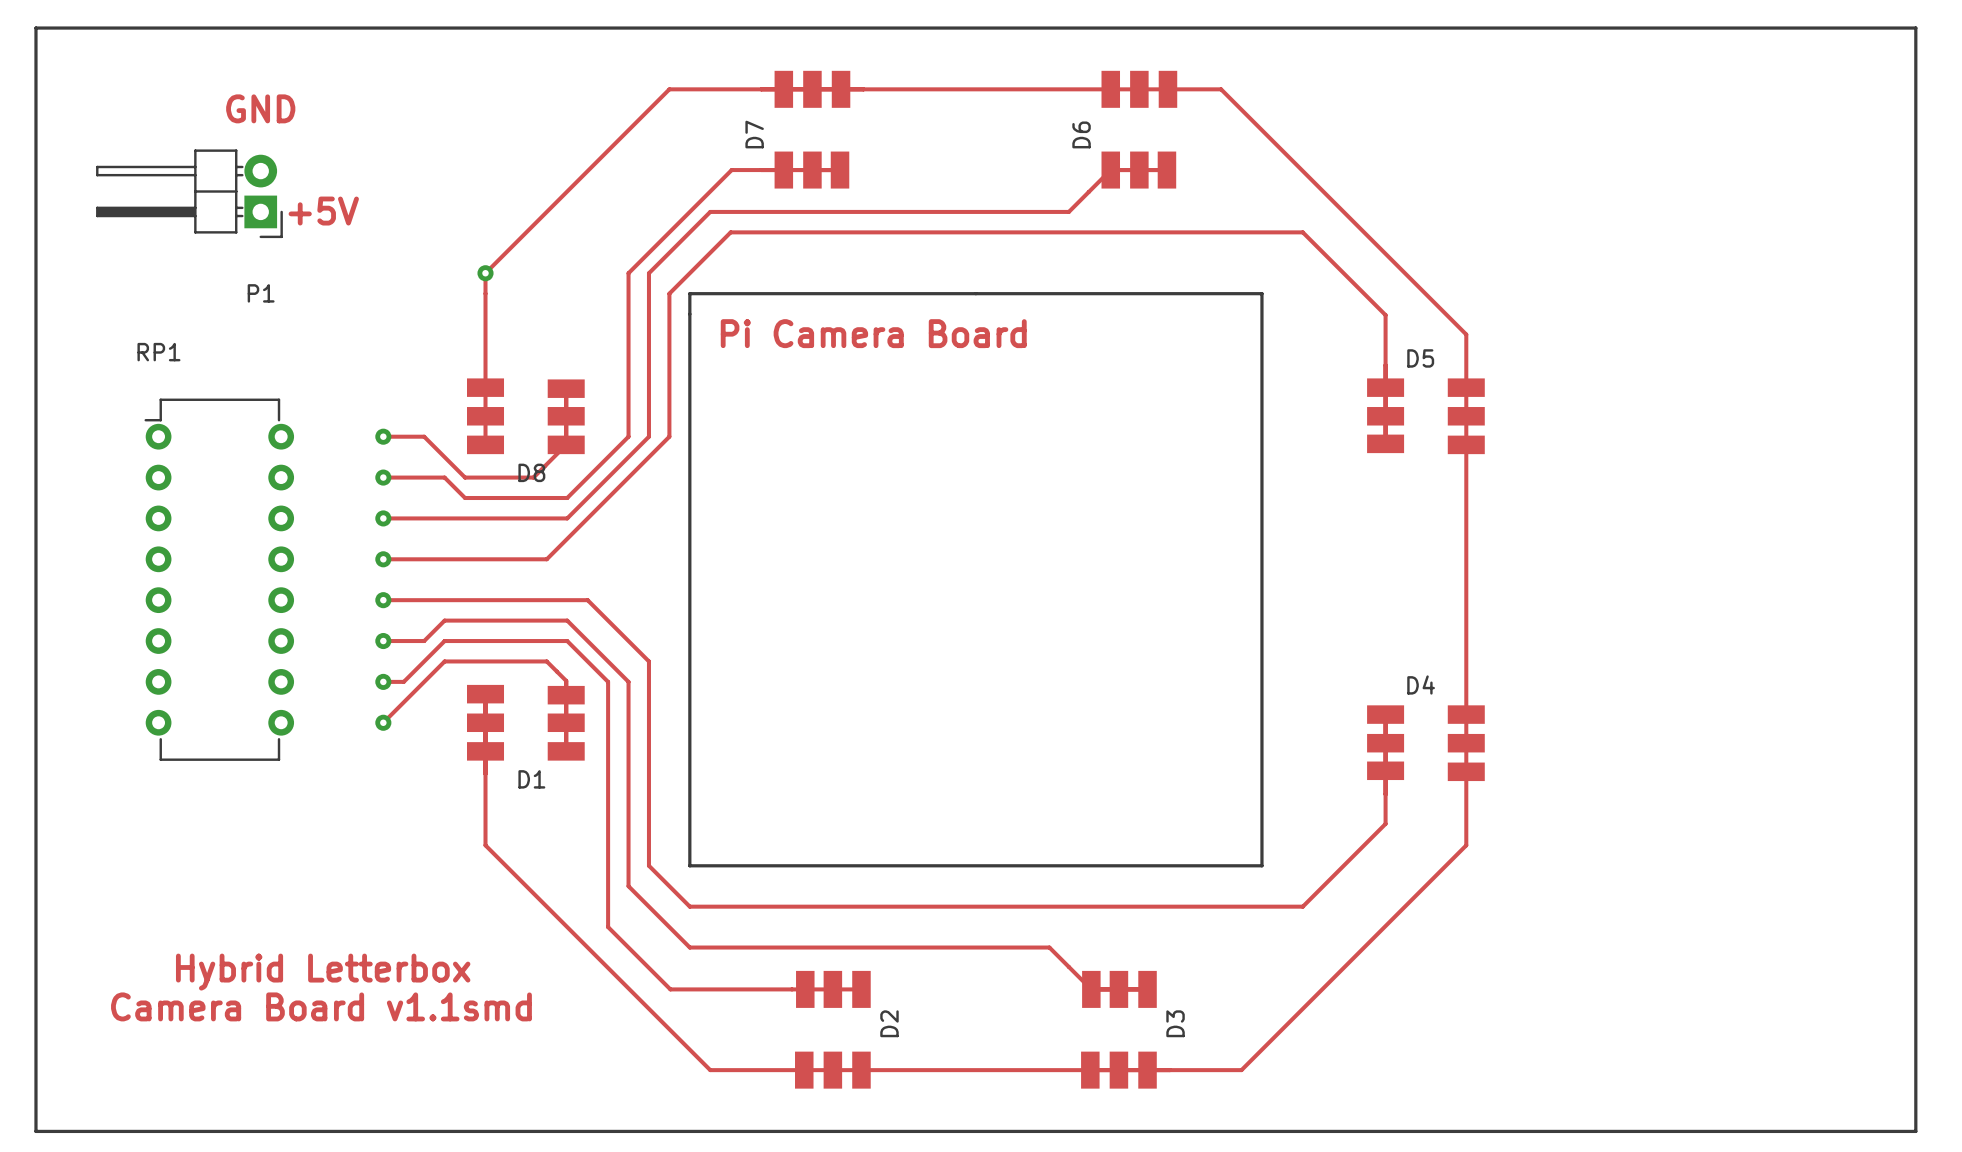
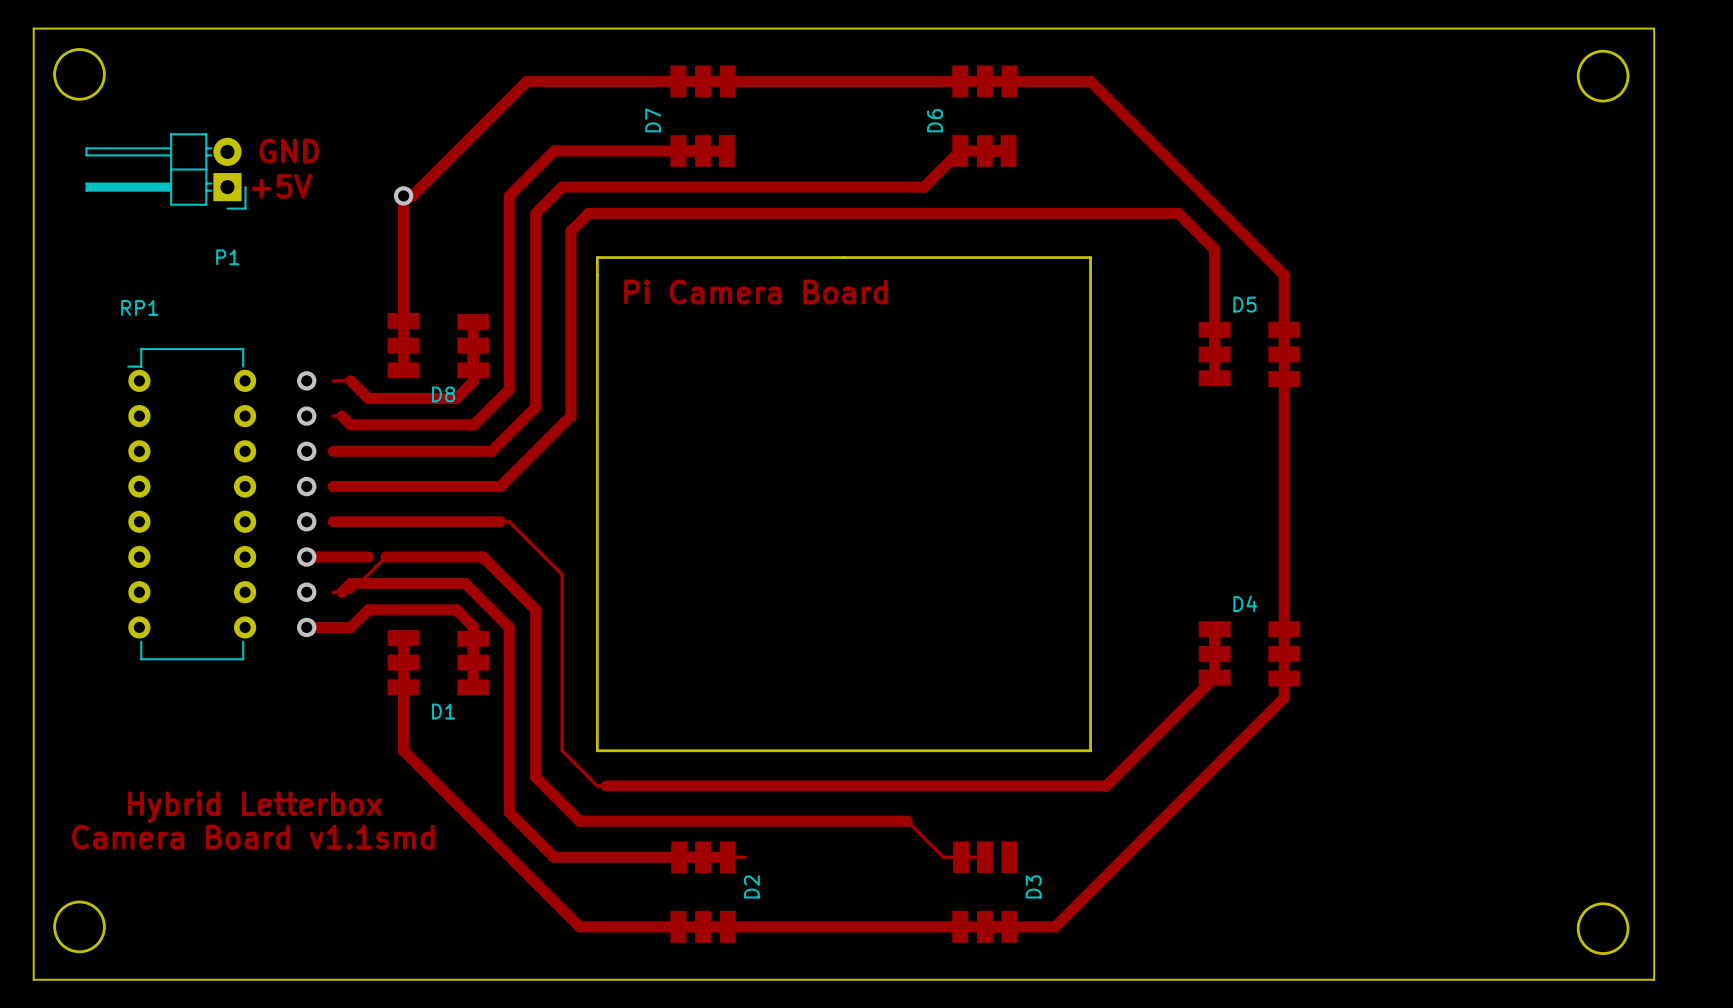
line: (35, 28) (35, 1131) (1915, 1131) (1915, 28) (35, 28) -> none
board edge: none -> (33, 28) (33, 979) (1654, 979) (1654, 28) (33, 28)
round board edge: none -> [53, 48, 106, 101]
round board edge: none -> [1576, 49, 1630, 103]
track: (669, 89) (485, 273) (485, 444) -> (579, 81) (526, 81) (412, 195) (403, 195) (403, 370)
track width: thin (669, 89) (1221, 89) -> thick (579, 81) (1055, 81)
track: (1221, 89) (1466, 334) (1466, 845) (1241, 1070) (1221, 1070) -> (1055, 81) (1090, 81) (1284, 275) (1284, 697) (1055, 926)
text position: GND (260, 108) -> GND (289, 151)
track: (731, 170) (628, 273) (628, 436) (567, 498) (465, 498) (444, 477) (393, 477) -> (633, 151) (554, 151) (509, 195) (509, 389) (474, 424) (350, 424) (341, 416)
track width: thin (731, 170) (840, 170) -> thick (633, 151) (726, 151)
track width: thin (1166, 170) (1110, 170) (1068, 211) (710, 211) -> thick (1008, 151) (960, 151) (924, 187) (614, 187)
track: (710, 211) (679, 242) -> (1214, 378) (1214, 249) (1178, 213) (588, 213)
via: none -> (403, 195)
track width: thin (679, 242) (659, 263) -> thick (588, 213) (570, 231)
track: (659, 263) (648, 273) (648, 436) (618, 467) -> (614, 187) (562, 187) (535, 213) (535, 407)
via: (485, 273) -> none
line: (689, 293) (1261, 293) (1261, 865) (689, 865) (689, 293) -> none
board edge: none -> (597, 257) (1090, 257) (1090, 750) (597, 750) (597, 257)
track: (566, 388) (566, 444) (533, 477) (465, 477) (424, 436) (403, 436) -> (473, 321) (473, 381) (456, 398) (368, 398) (350, 380)
D8 position: (525, 416) -> (438, 345)
D5 position: (1425, 416) -> (1249, 354)
via: none -> (306, 380)
via: (383, 436) -> none
track: (1385, 443) (1385, 315) (1302, 232) (730, 232) (669, 293) (669, 436) (546, 559) -> (570, 231) (570, 416) (500, 486) (474, 486)
track width: thin (618, 467) (567, 518) (383, 518) -> thick (535, 407) (491, 451) (333, 451)
via: none -> (306, 416)
via: (383, 477) -> none
via: none -> (306, 451)
via: (383, 518) -> none
via: none -> (306, 486)
track width: thin (383, 559) (546, 559) -> thick (333, 486) (474, 486)
via: (383, 559) -> none
via: none -> (306, 521)
track width: thin (383, 600) (577, 600) -> thick (333, 521) (500, 521)
via: (383, 600) -> none
track: none -> (306, 557) (333, 557)
via: none -> (306, 557)
track width: thin (383, 641) (424, 641) -> thick (333, 557) (368, 557)
via: (383, 641) -> none
track: (424, 641) (444, 620) (567, 620) (628, 681) (628, 886) (689, 947) -> none
track width: thin (444, 641) (557, 641) -> thick (385, 557) (482, 557)
track: (557, 641) (567, 641) (608, 681) (608, 927) (670, 989) -> (482, 557) (535, 609) (535, 777) (579, 821) (597, 821)
via: none -> (306, 592)
via: (383, 681) -> none
track: none -> (341, 592) (350, 583) (465, 583) (509, 627) (509, 812) (554, 857) (580, 857)
track: (485, 694) (485, 845) (710, 1070) -> (403, 638) (403, 750) (579, 926) (614, 926)
track: (1385, 714) (1385, 823) (1302, 906) (1280, 906) -> (1214, 629) (1214, 677) (1106, 785)
track: none -> (306, 627) (350, 627) (368, 609) (456, 609) (473, 626) (473, 687)
via: none -> (306, 627)
track: (383, 722) (444, 661) (546, 661) (566, 680) (566, 751) -> none
via: (383, 722) -> none
D1 position: (525, 722) -> (438, 662)
D4 position: (1425, 743) -> (1249, 653)
track width: thin (700, 906) (1280, 906) -> thick (606, 785) (1106, 785)
track width: thin (689, 947) (1049, 947) -> thick (597, 821) (907, 821)
text position: Hybrid Letterbox (323, 972) -> Hybrid Letterbox (254, 807)
track width: thin (670, 989) (841, 989) -> thick (580, 857) (727, 857)
text position: Camera Board v1.1smd (321, 1006) -> Camera Board v1.1smd (253, 837)
D2 position: (832, 1029) -> (703, 892)
D3 position: (1118, 1029) -> (984, 892)
round board edge: none -> [53, 900, 106, 954]
round board edge: none -> [1576, 902, 1630, 955]
track width: thin (710, 1070) (1221, 1070) -> thick (614, 926) (1055, 926)

